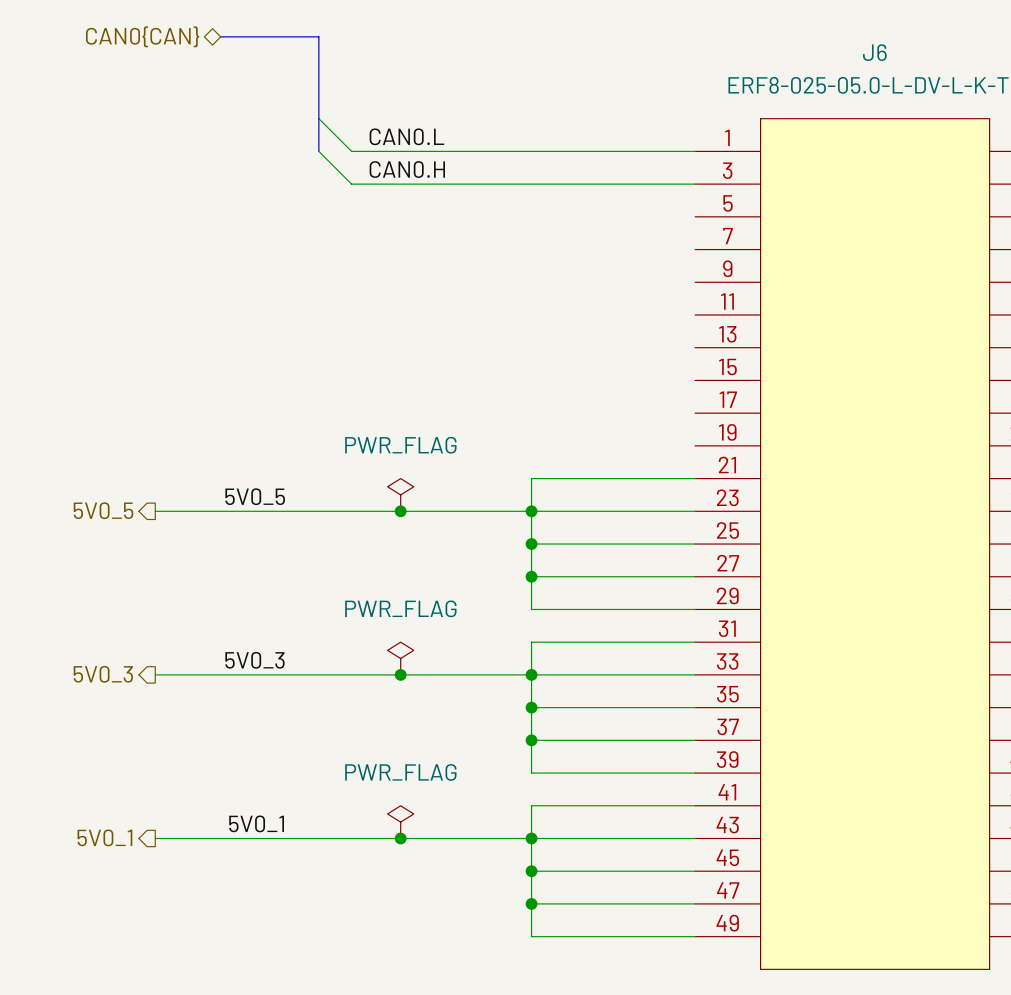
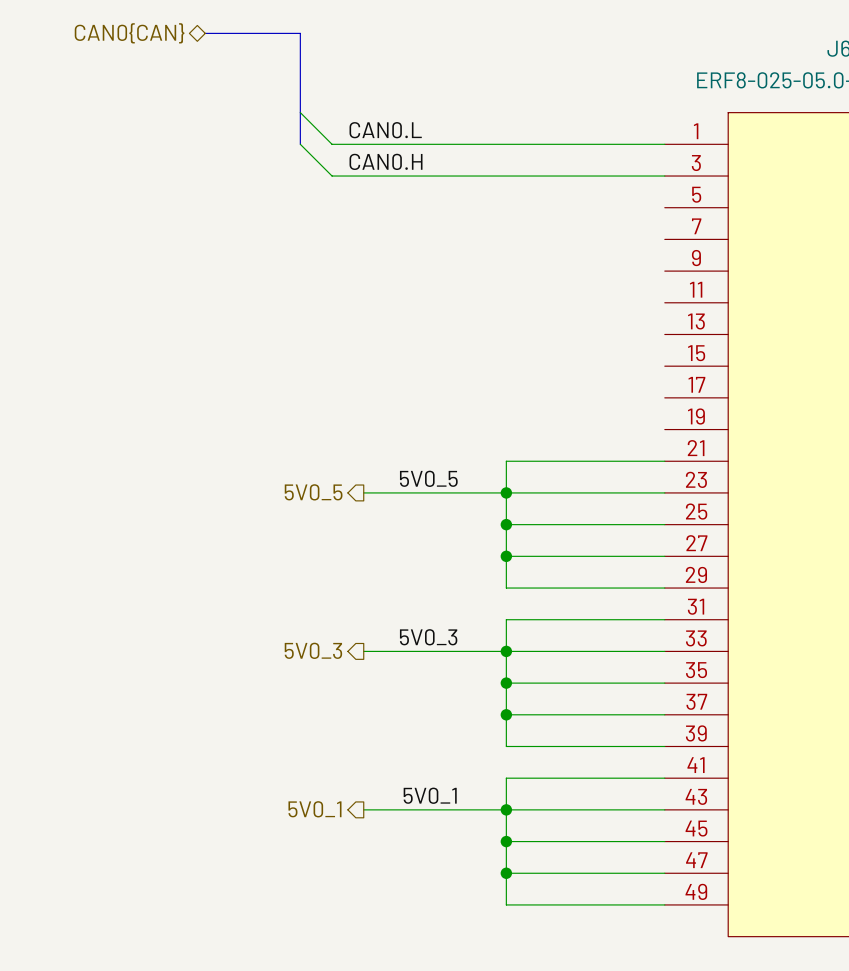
power symbol: PWR_FLAG (400, 494) -> none
label position: 5V0_5 (255, 496) -> 5V0_5 (428, 478)
hierarchical label position: 5V0_5 (103, 510) -> 5V0_5 (313, 492)
wire: (155, 511) (384, 511) -> none
junction: (400, 511) -> none
power symbol: PWR_FLAG (400, 658) -> none
label position: 5V0_3 (255, 660) -> 5V0_3 (428, 637)
hierarchical label position: 5V0_3 (103, 674) -> 5V0_3 (313, 650)
wire: (155, 674) (384, 674) -> none
junction: (400, 674) -> none
power symbol: PWR_FLAG (400, 822) -> none
label position: 5V0_1 (256, 823) -> 5V0_1 (430, 795)
hierarchical label position: 5V0_1 (104, 837) -> 5V0_1 (314, 809)
wire: (155, 838) (384, 838) -> none
junction: (400, 838) -> none

